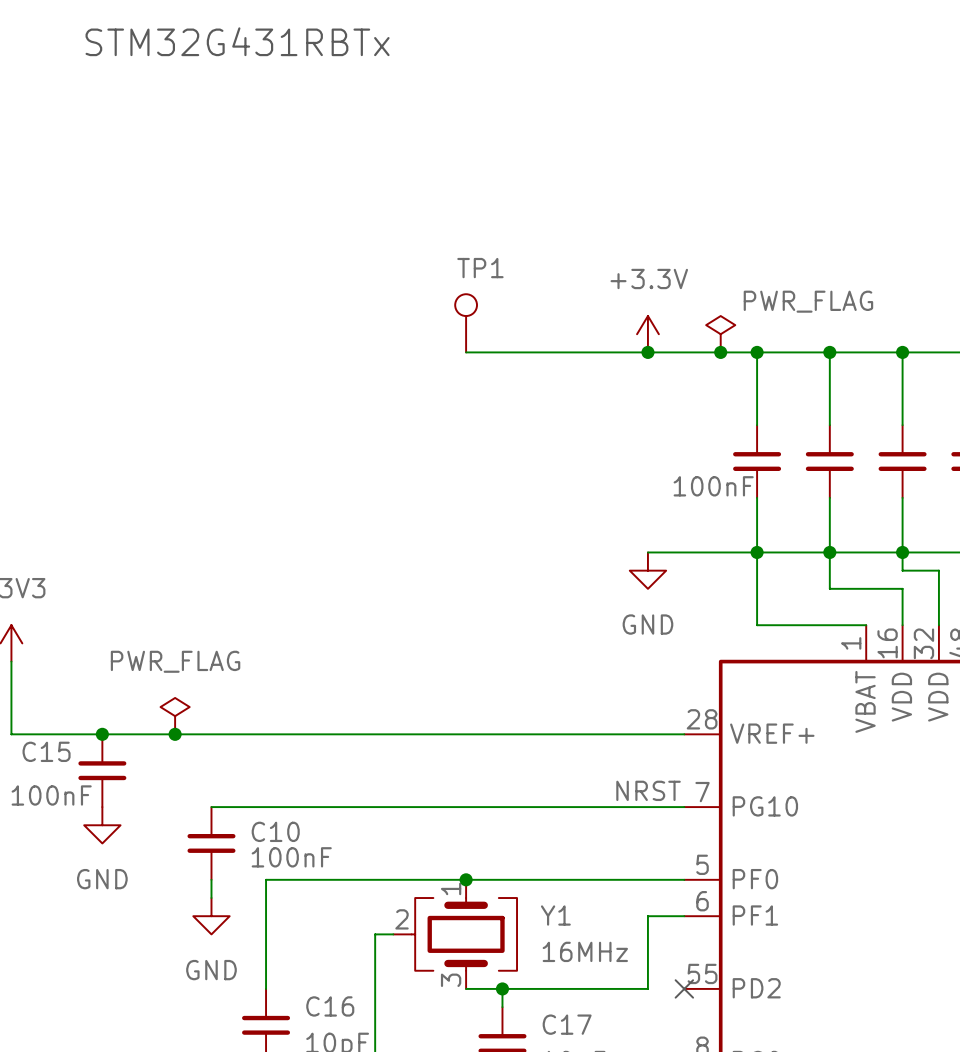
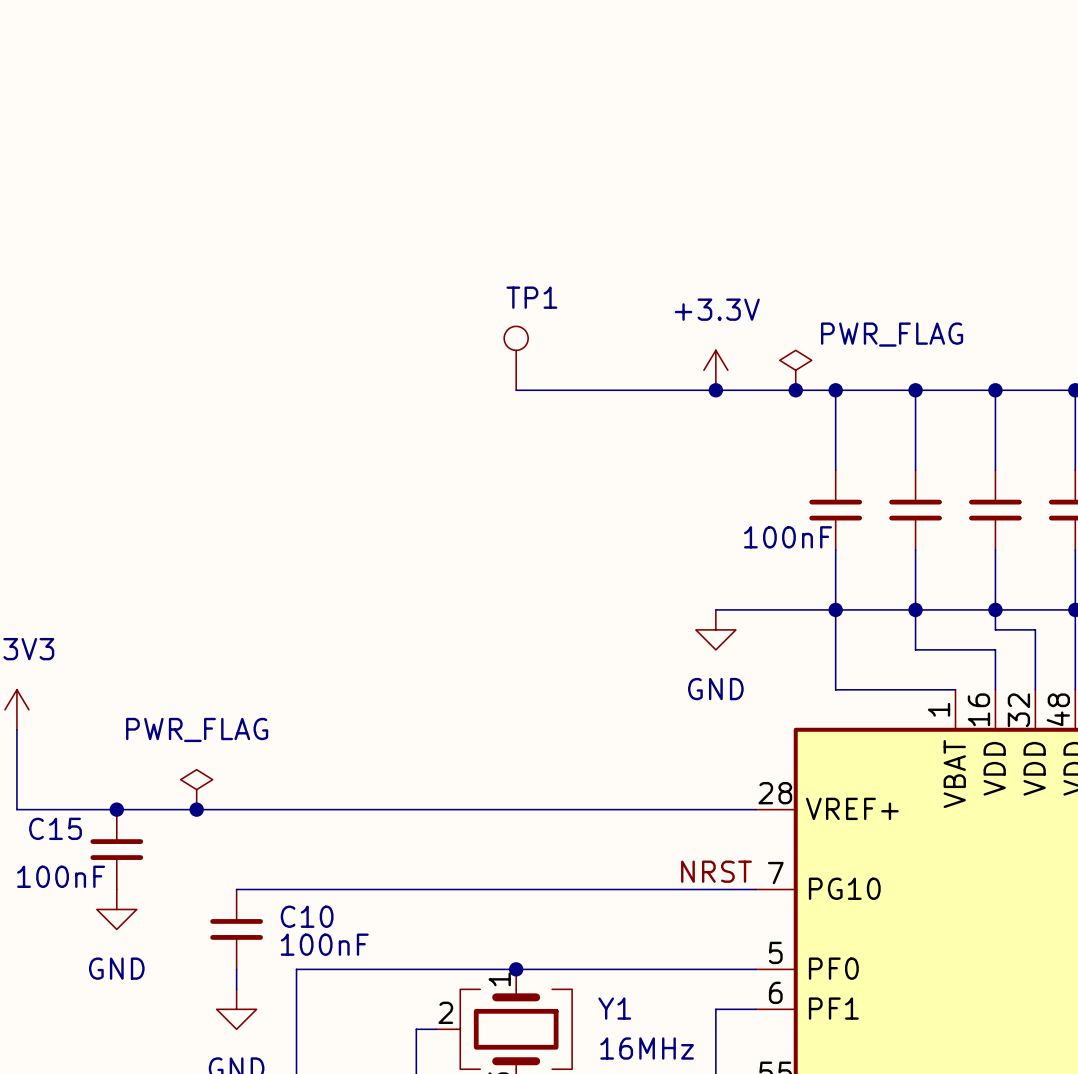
text: STM32G431RBTx (237, 41) -> none

